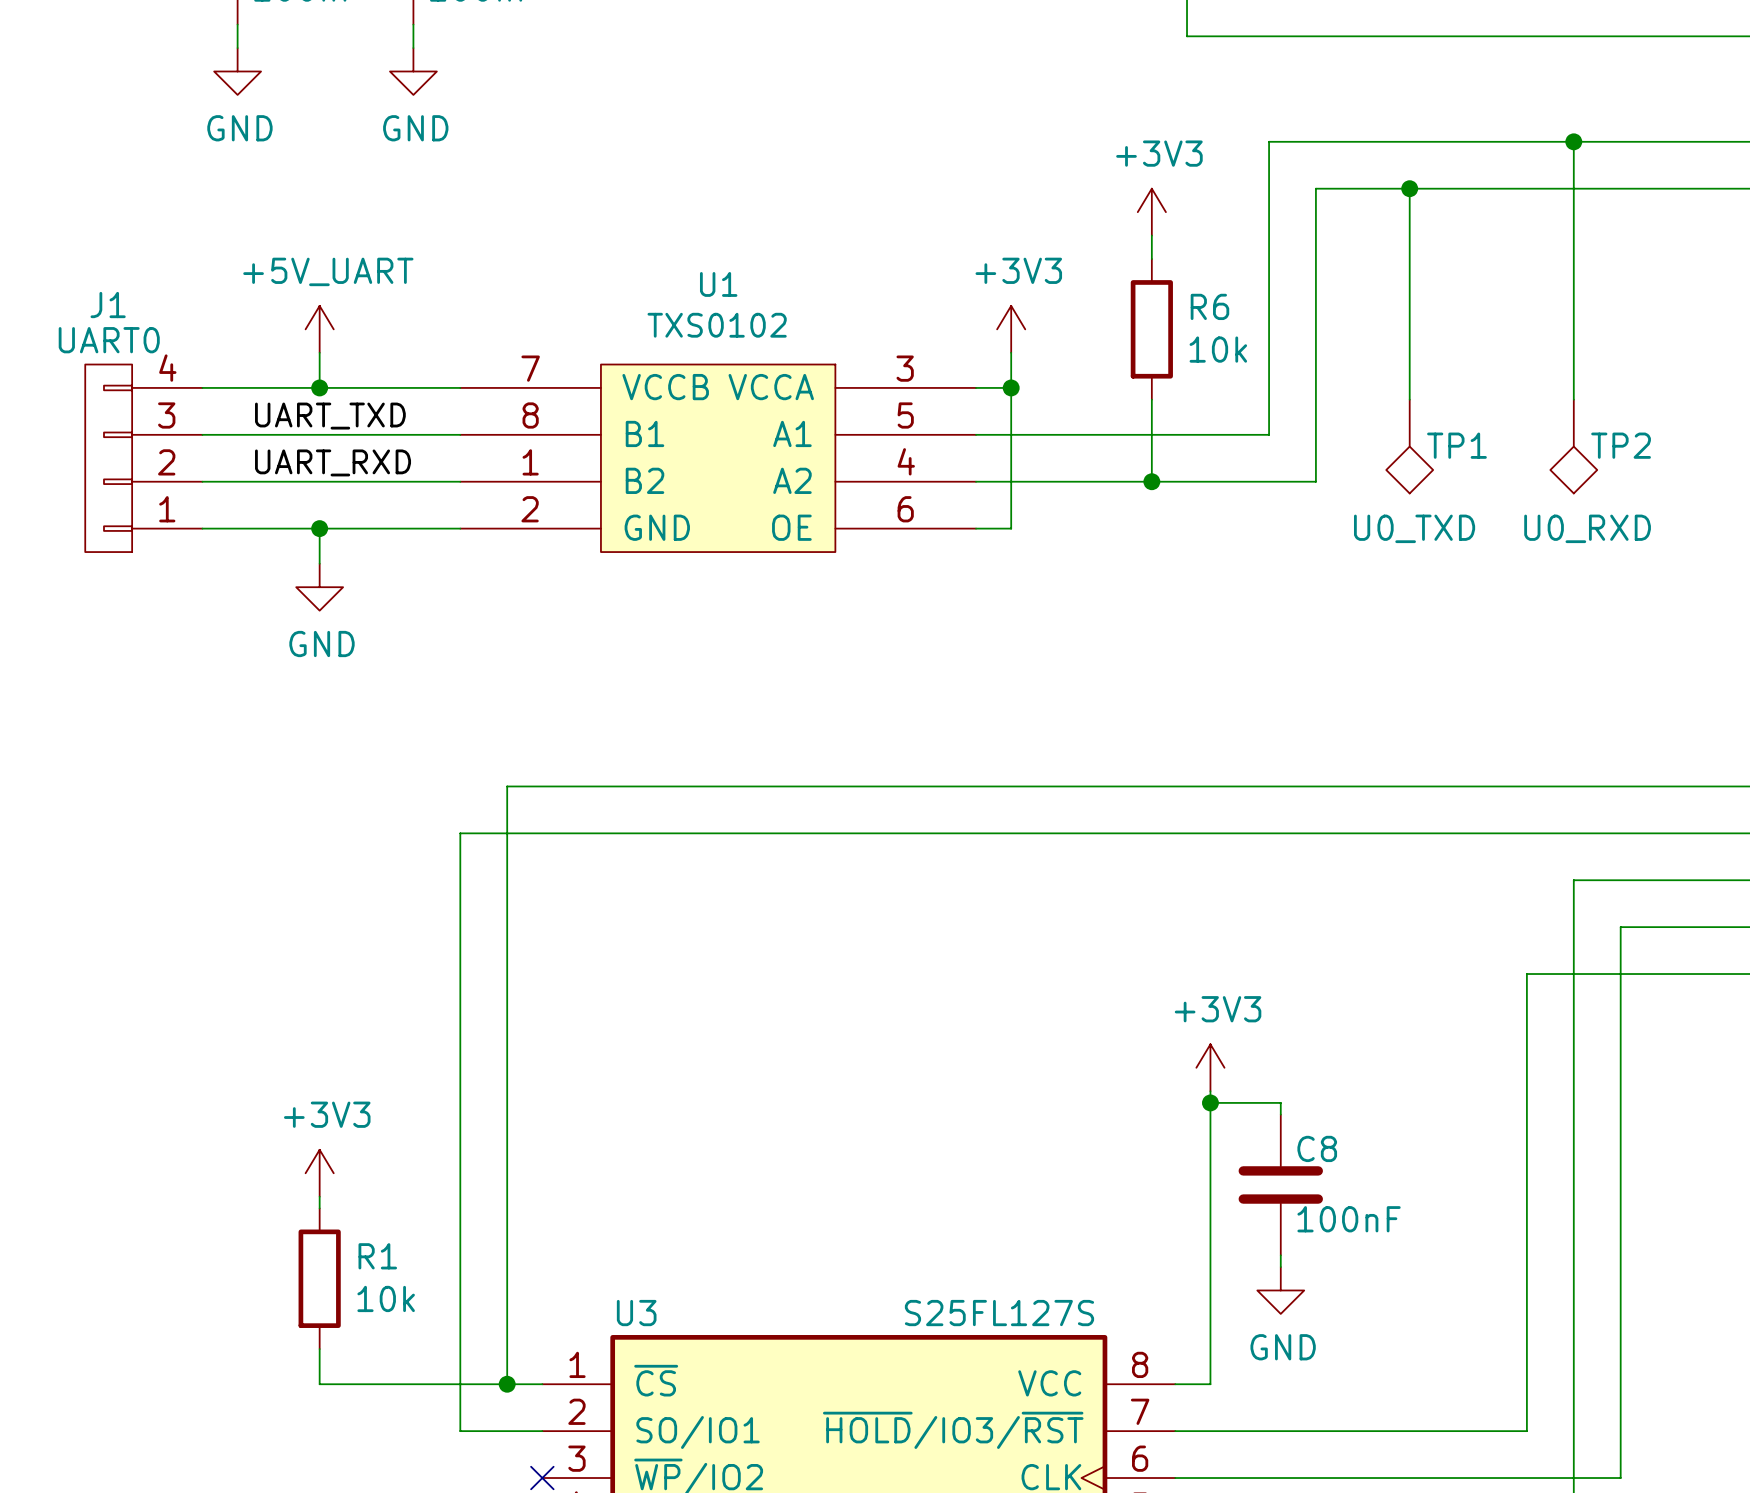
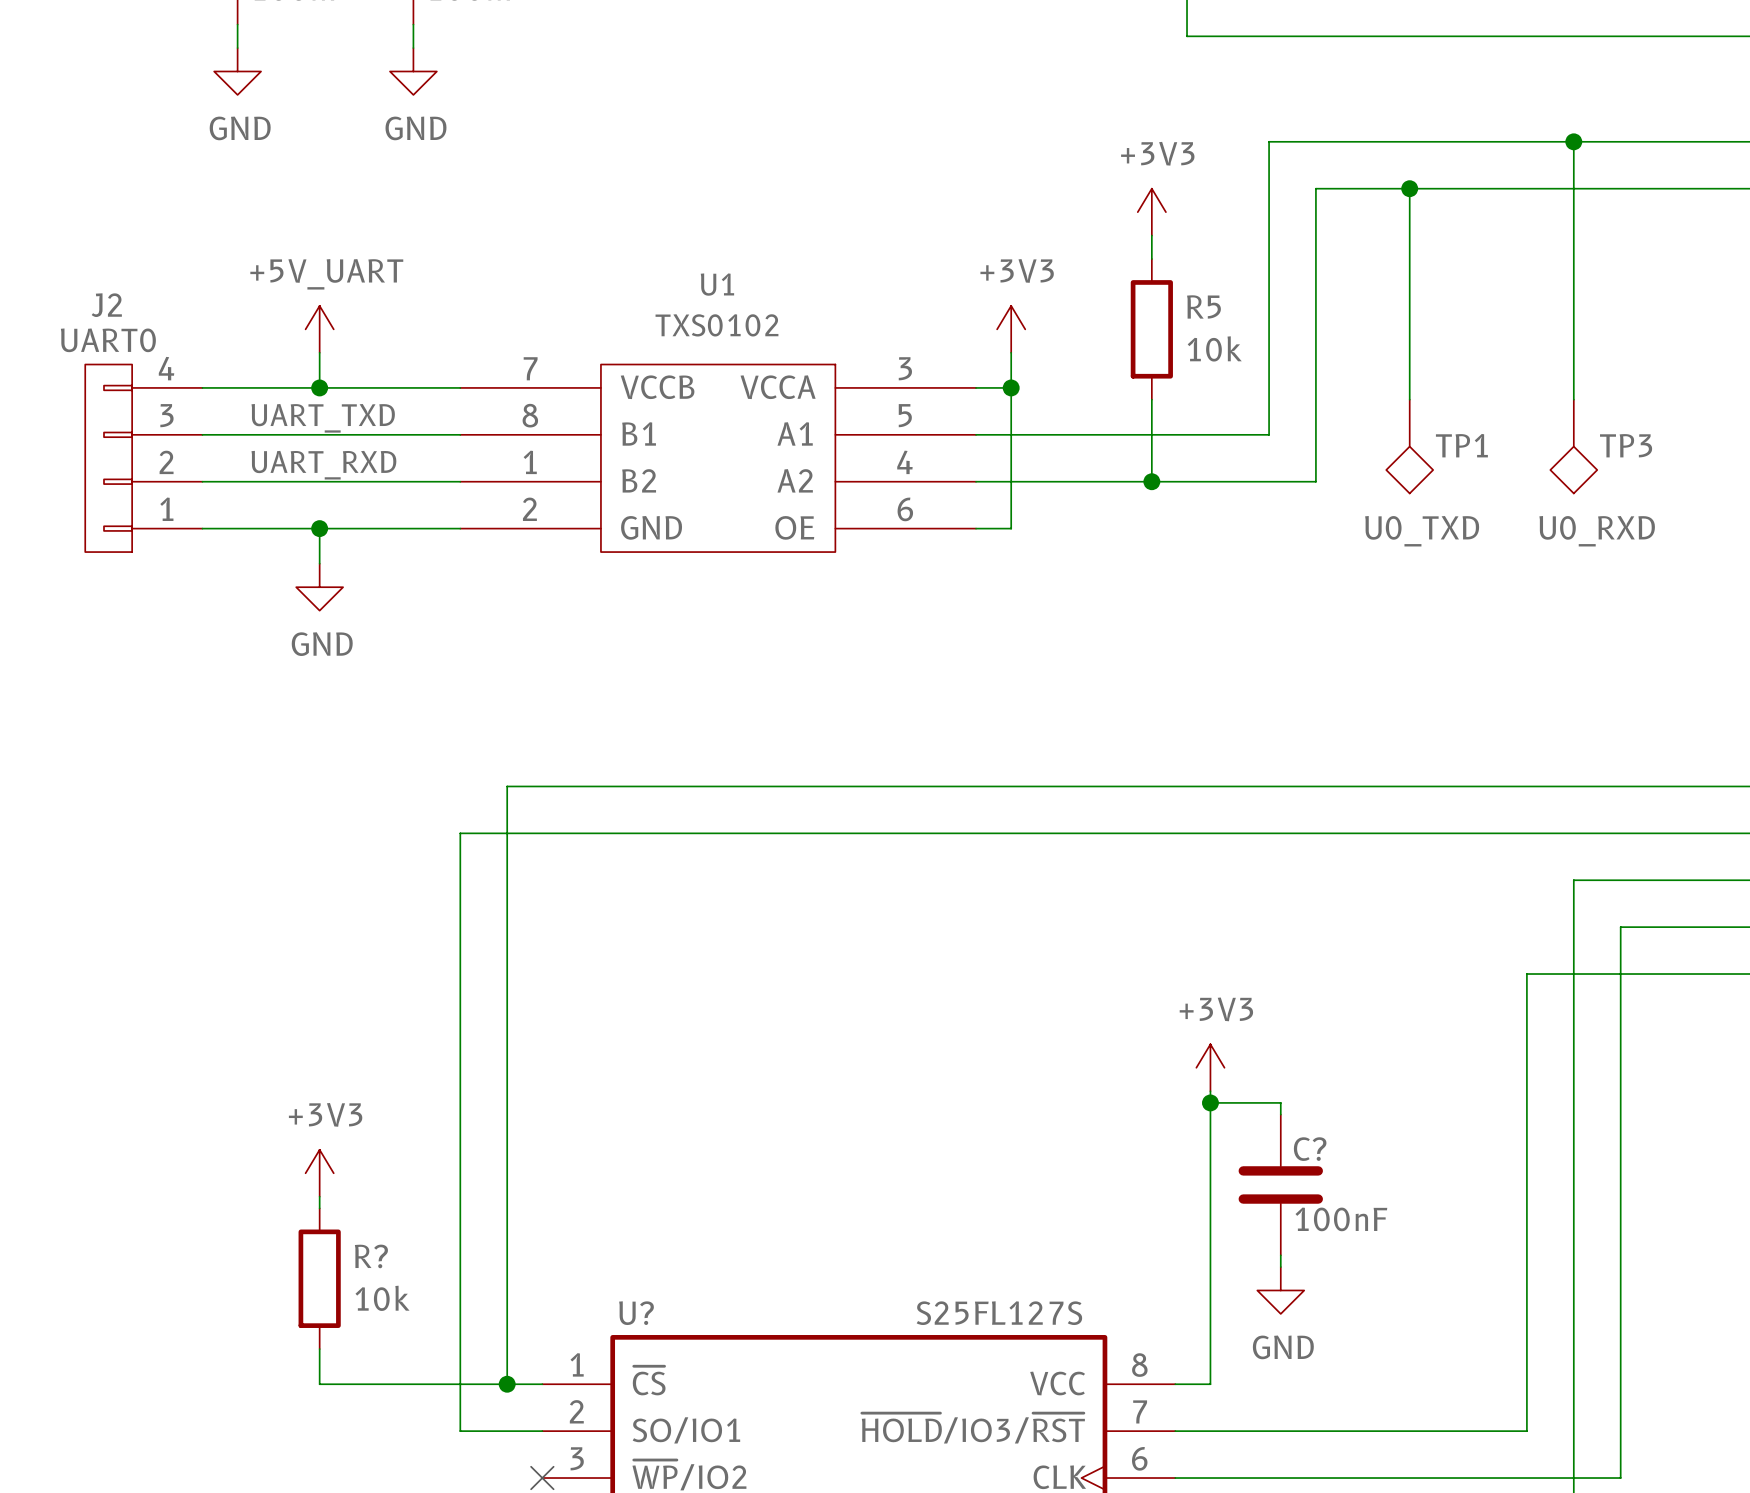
J1 name: J1 (108, 305) -> J2 (106, 305)
R6 name: R6 (1209, 306) -> R5 (1203, 306)
TP2 name: TP2 (1621, 445) -> TP3 (1626, 445)
C8 name: C8 (1317, 1148) -> C? (1310, 1149)
R1 name: R1 (377, 1256) -> R? (371, 1256)
U3 name: U3 (636, 1313) -> U? (636, 1313)

